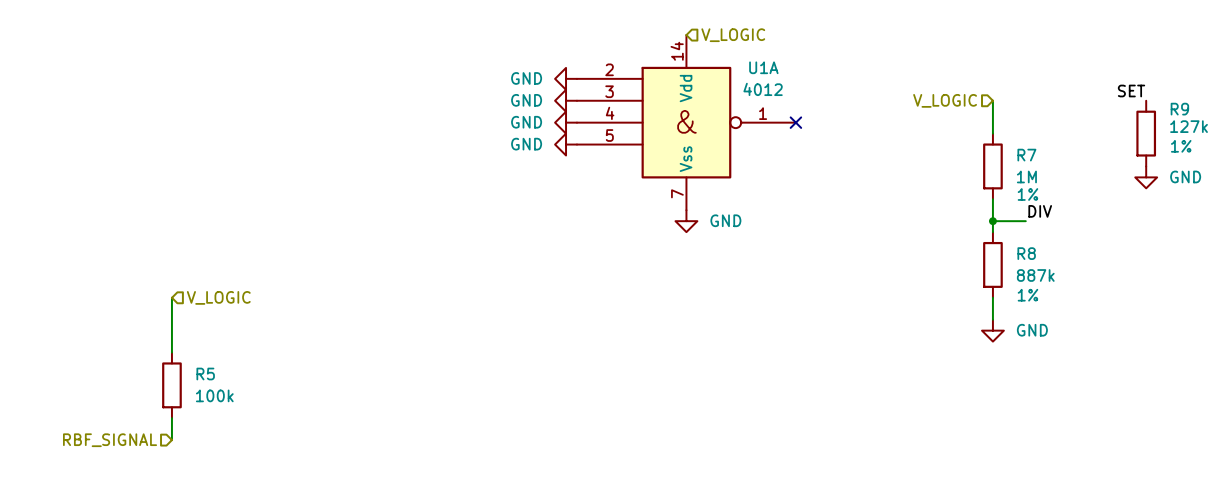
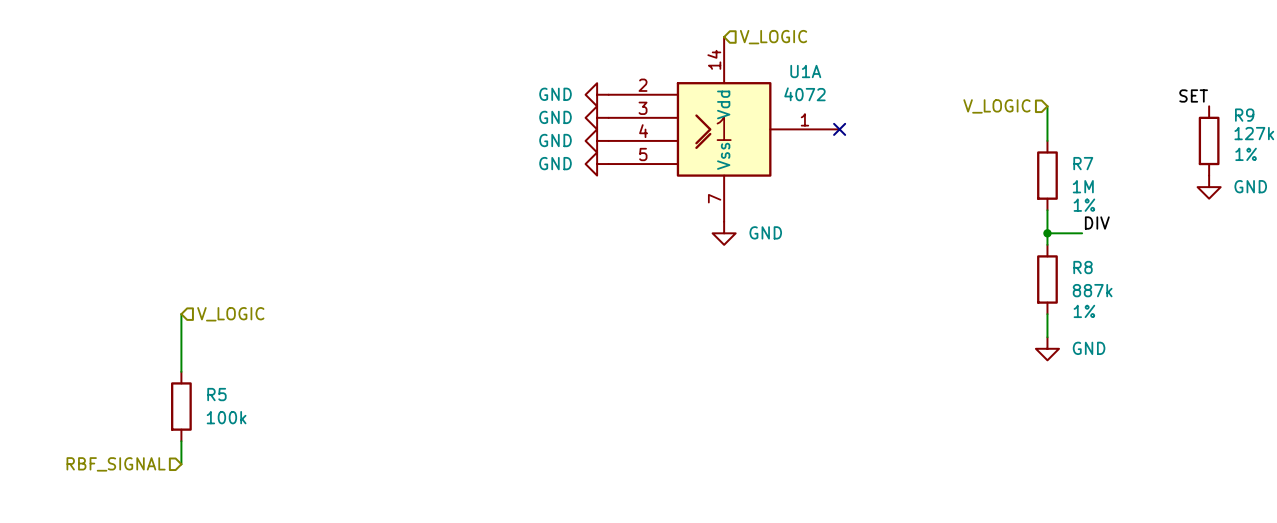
U1A symbol: [576, 35, 796, 211] -> [608, 37, 840, 222]
power symbol: GND (566, 78) -> none
power symbol: none -> GND (597, 94)
U1A value: 4012 (763, 89) -> 4072 (804, 94)
power symbol: GND (566, 100) -> none
power symbol: none -> GND (597, 117)
power symbol: GND (566, 122) -> none
power symbol: none -> GND (597, 140)
power symbol: GND (566, 144) -> none
power symbol: none -> GND (597, 164)

